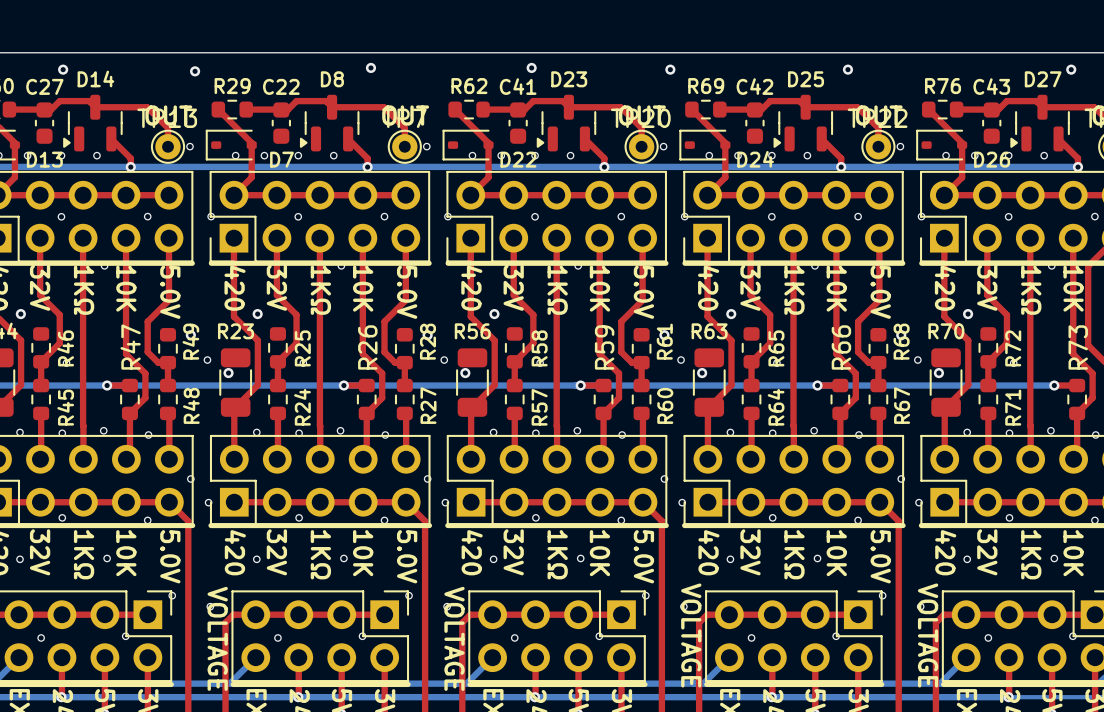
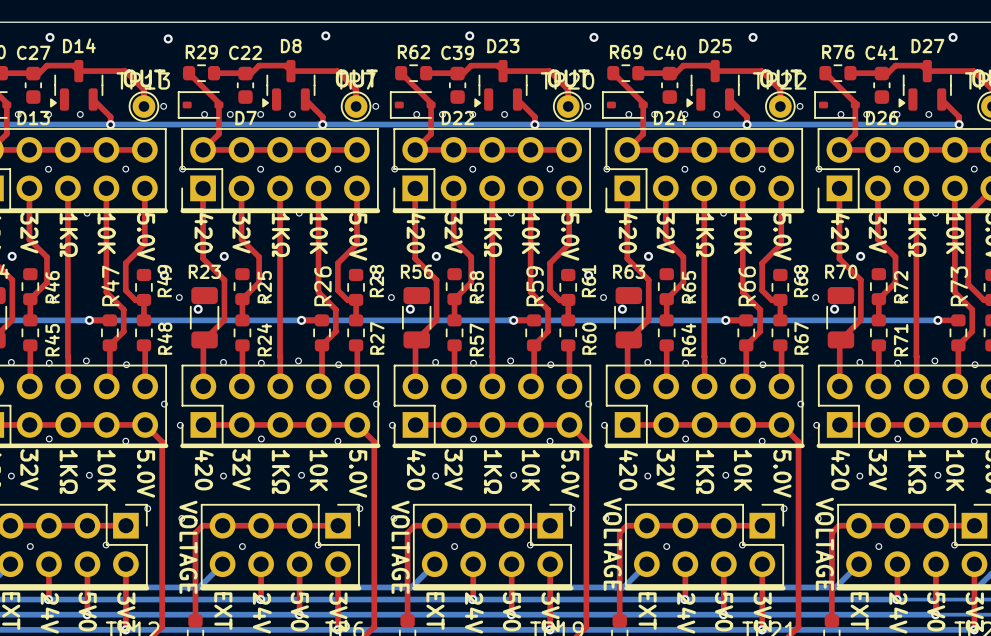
C41 name: C41 (518, 86) -> C39 (457, 52)
C42 name: C42 (754, 86) -> C40 (669, 52)
C43 name: C43 (991, 86) -> C41 (881, 52)

